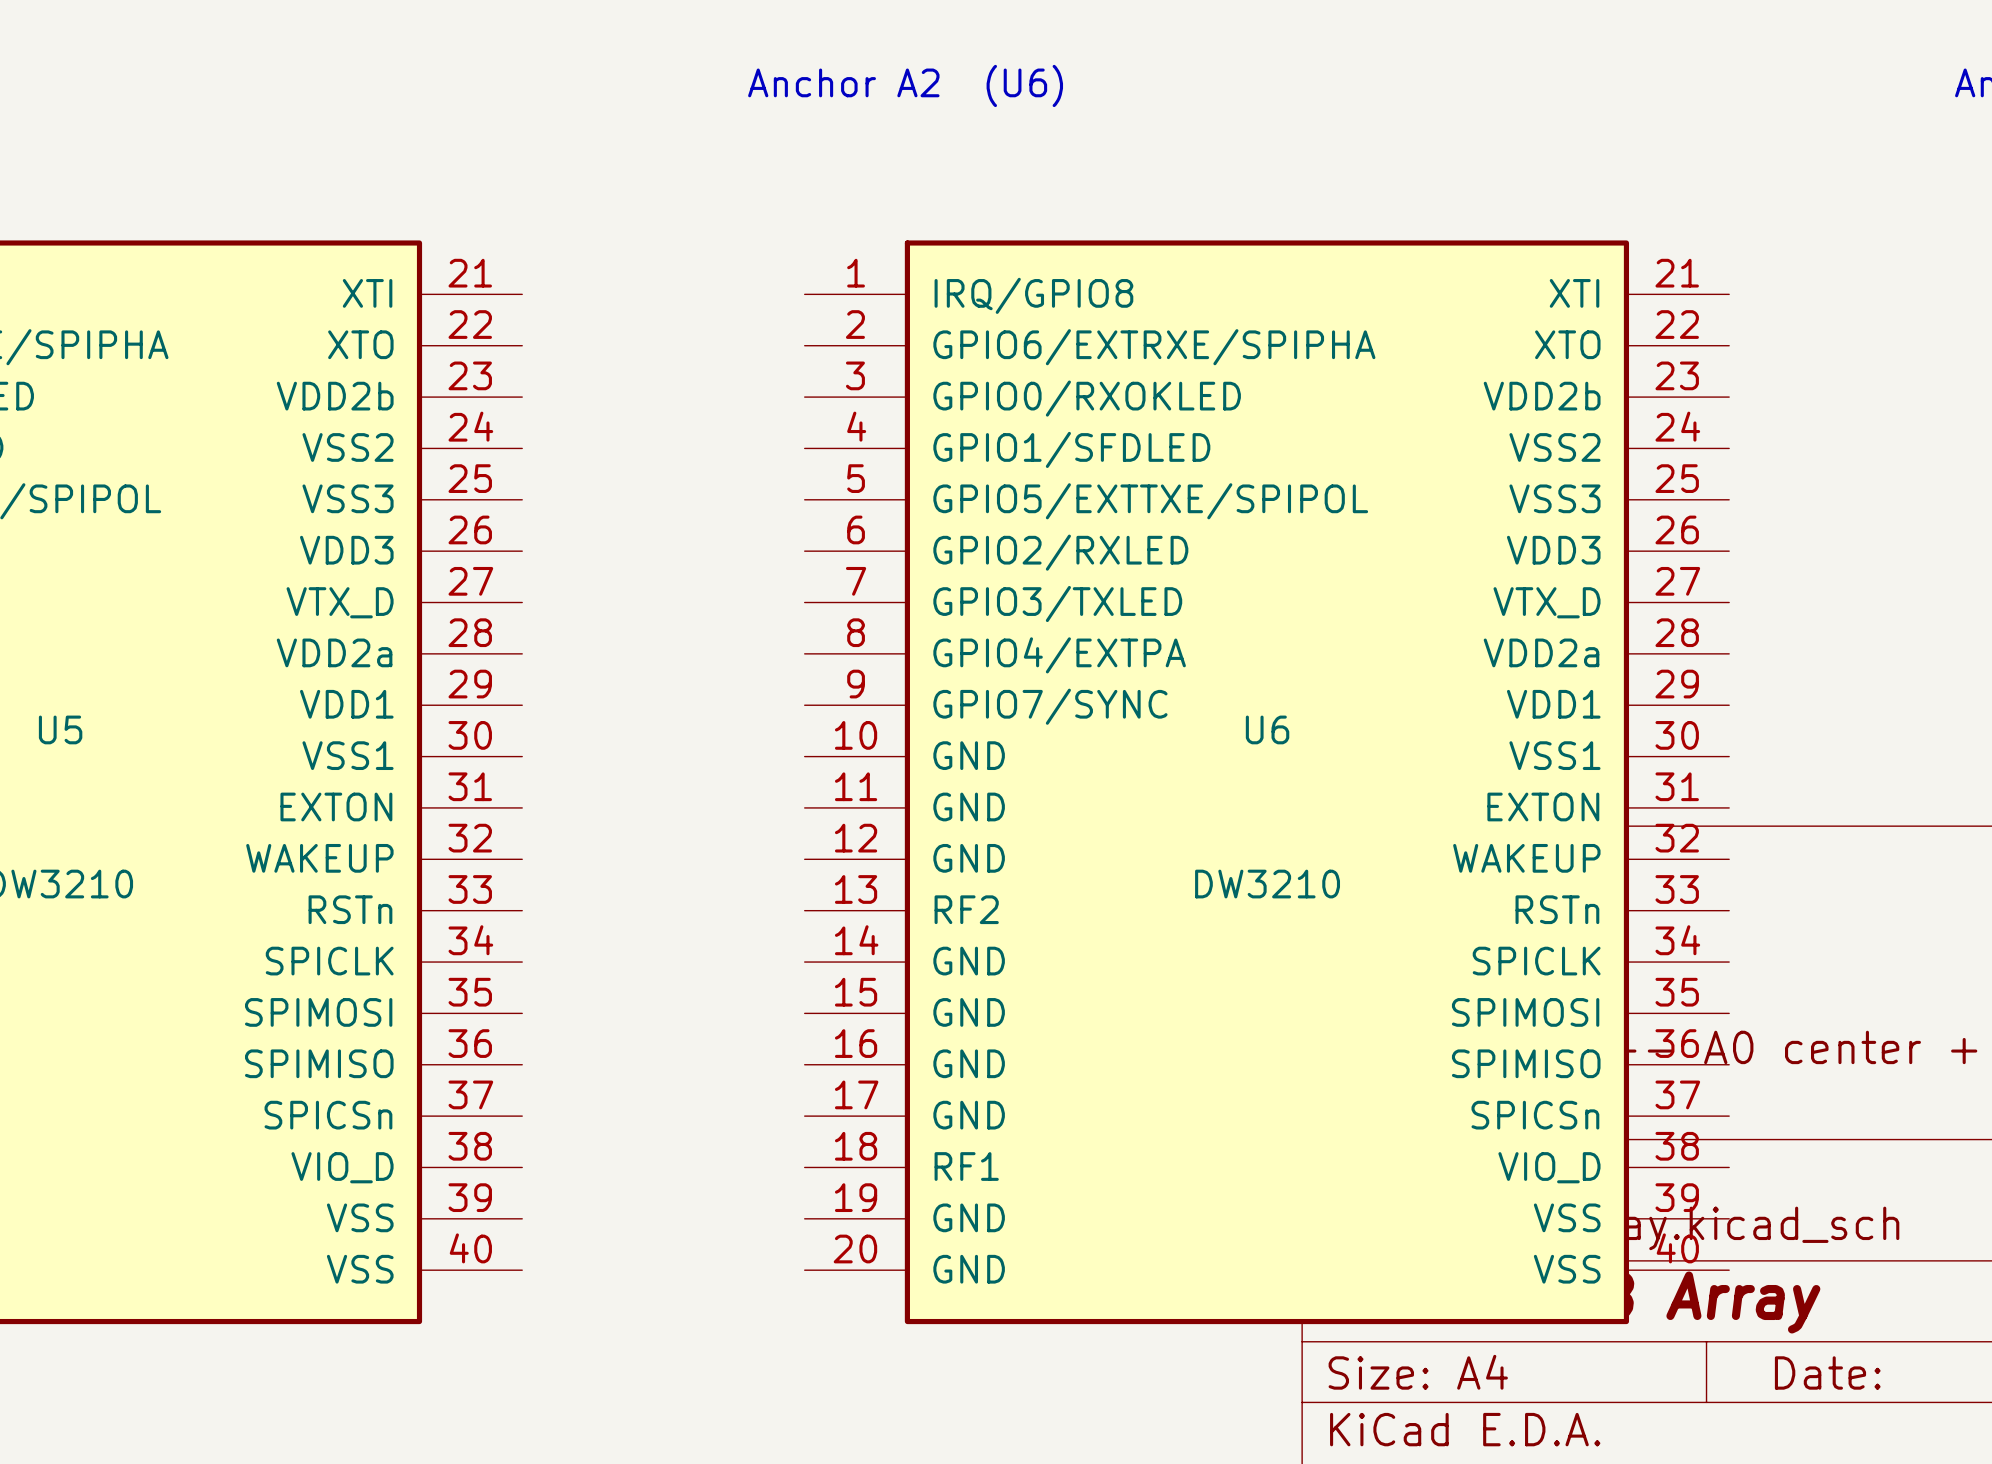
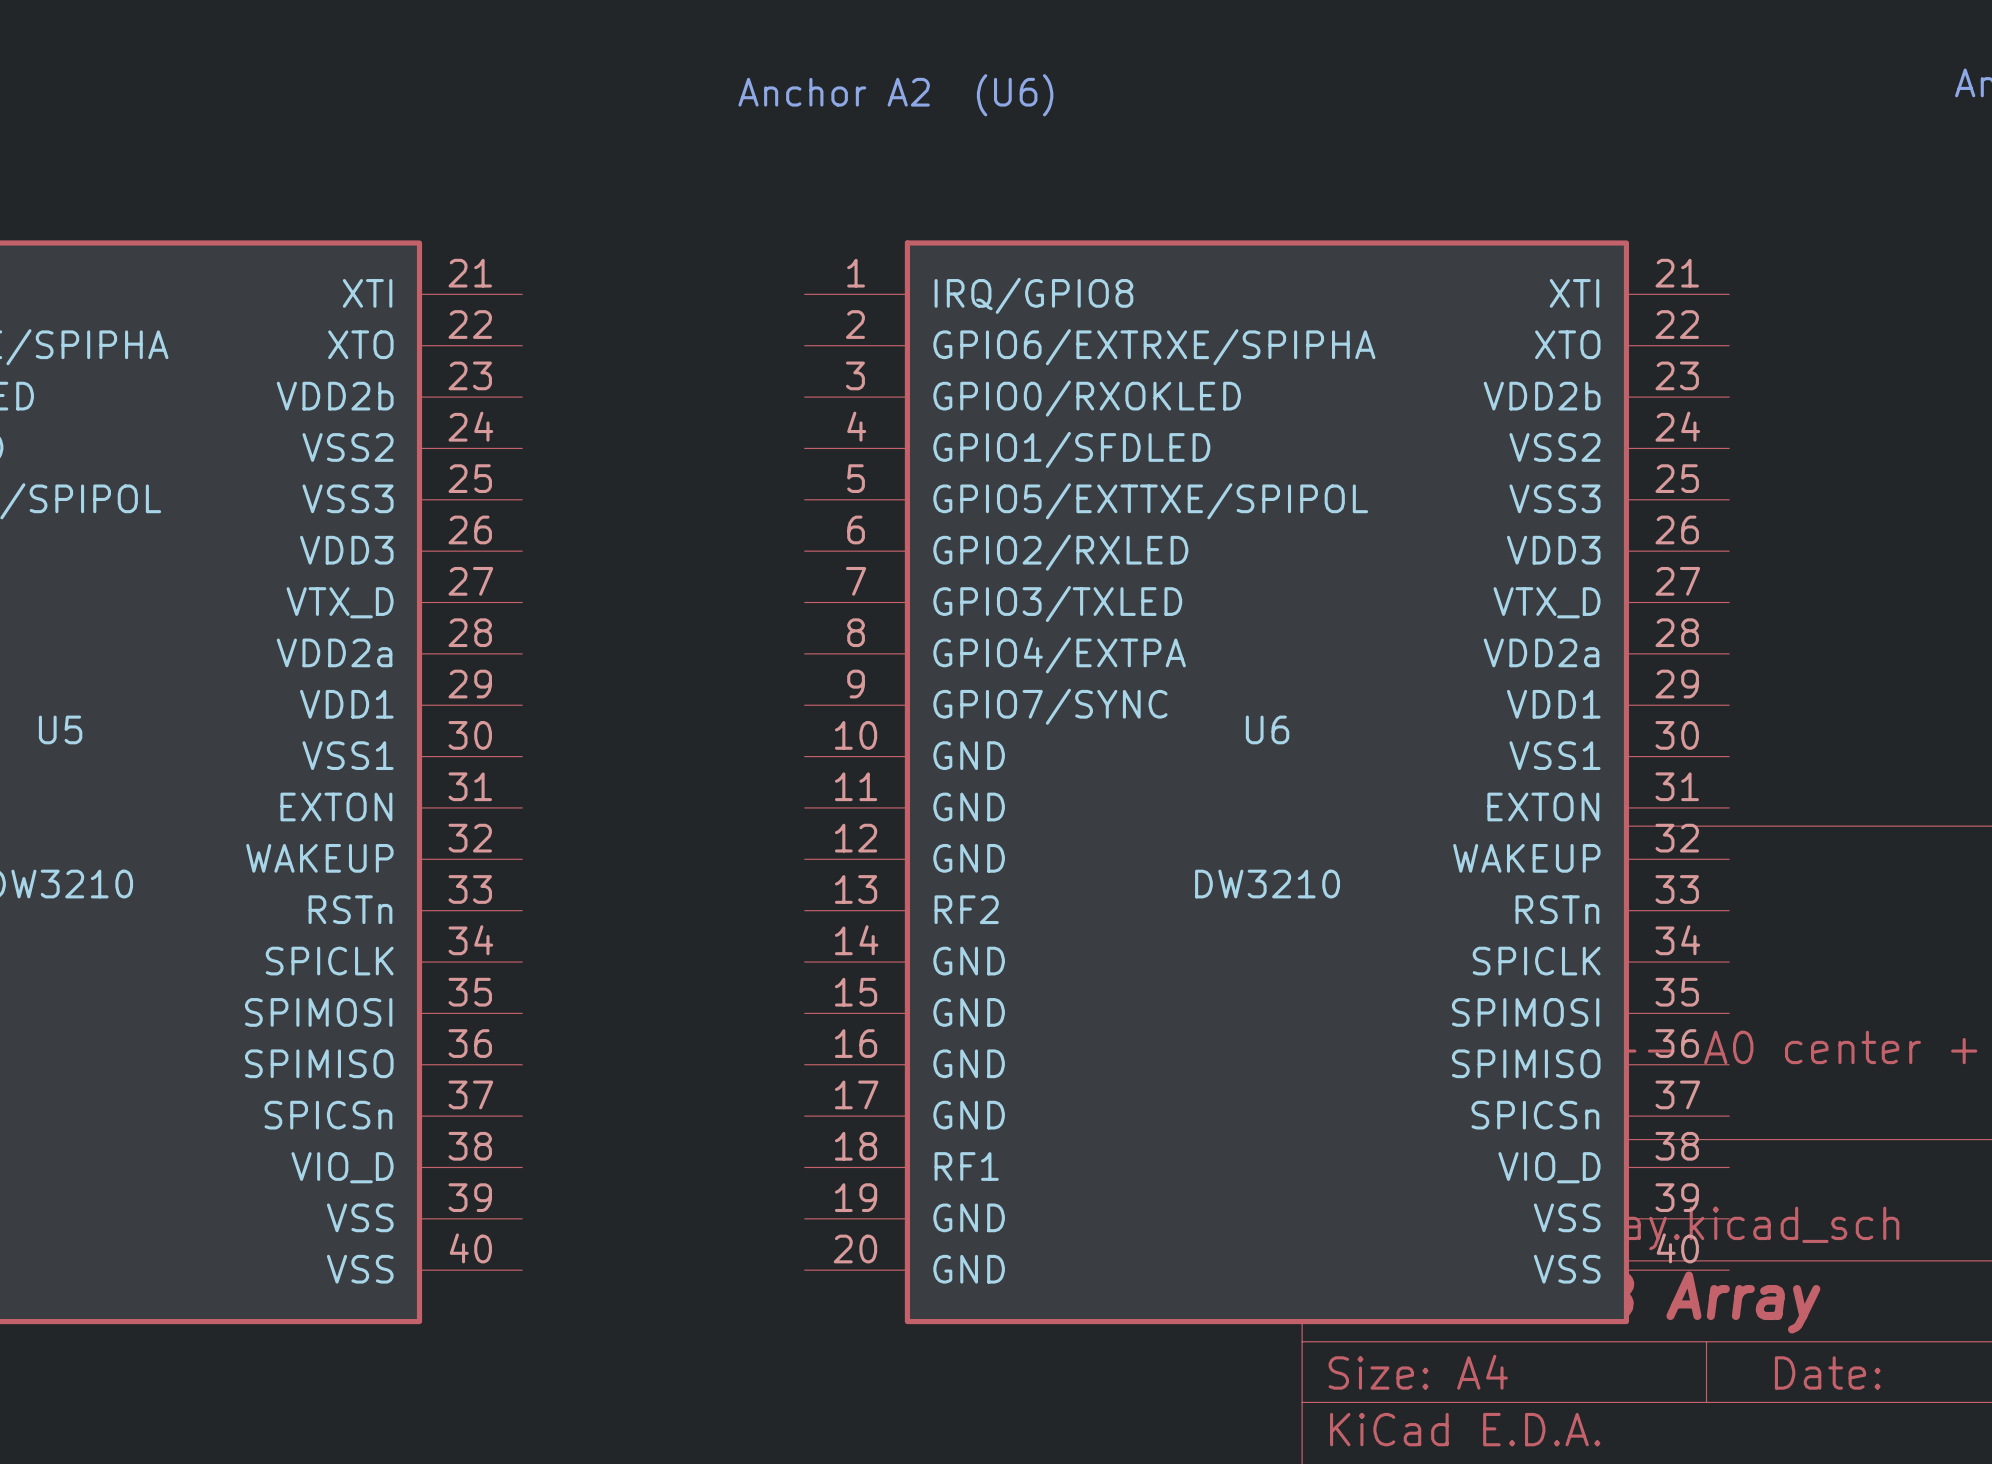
text position: Anchor A2 (U6) (905, 85) -> Anchor A2 (U6) (895, 95)

